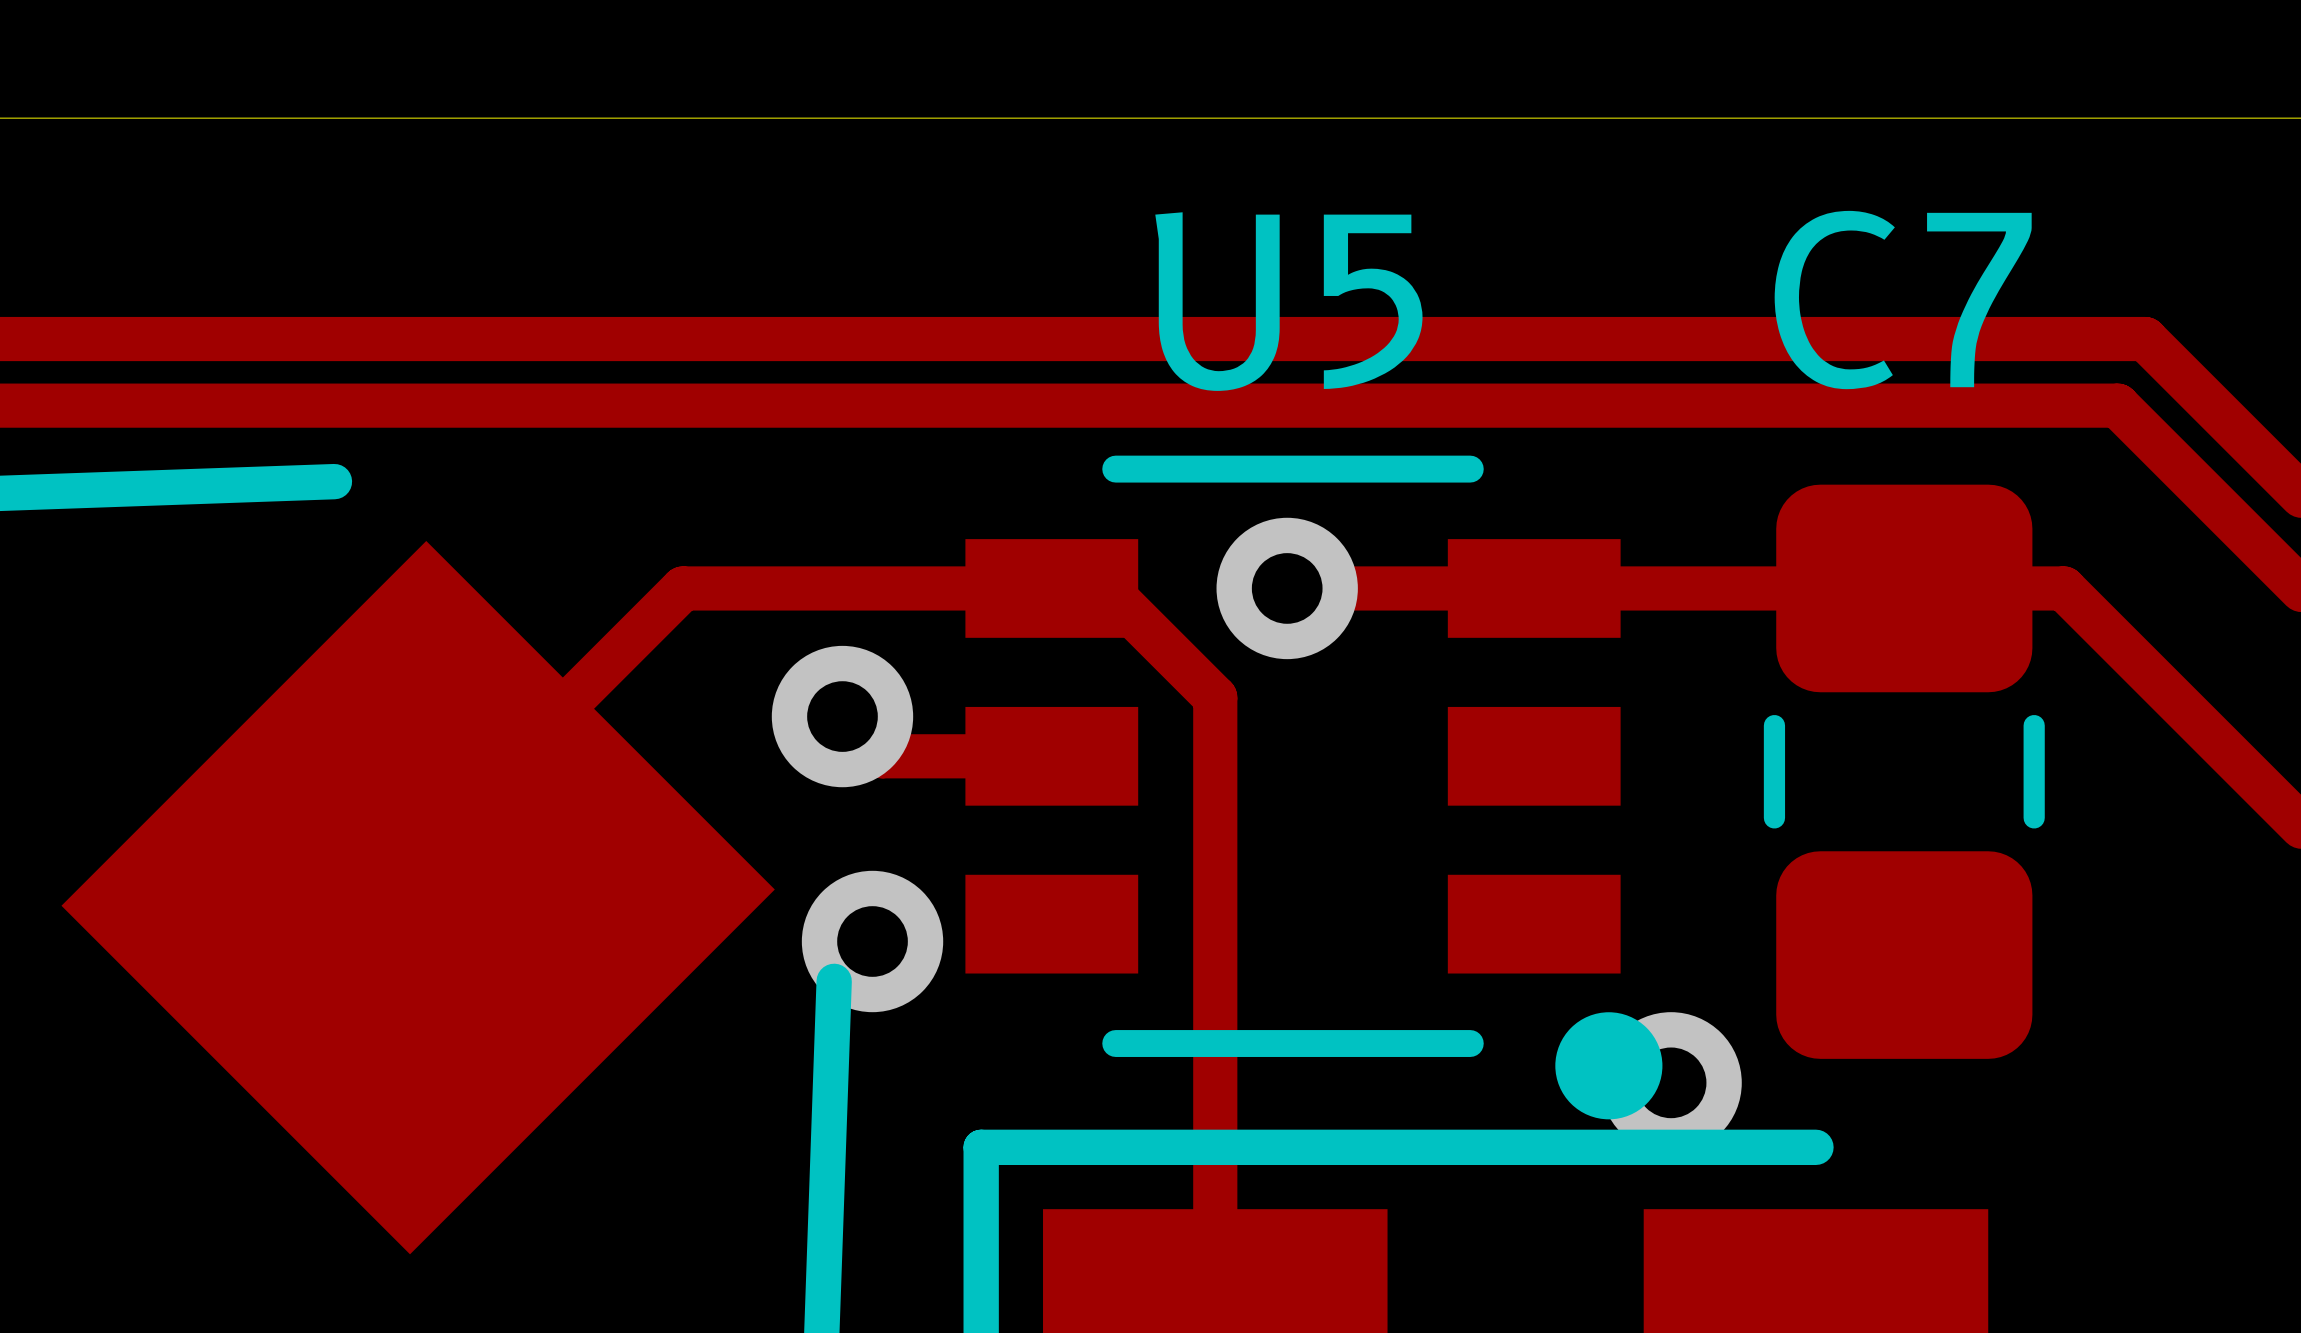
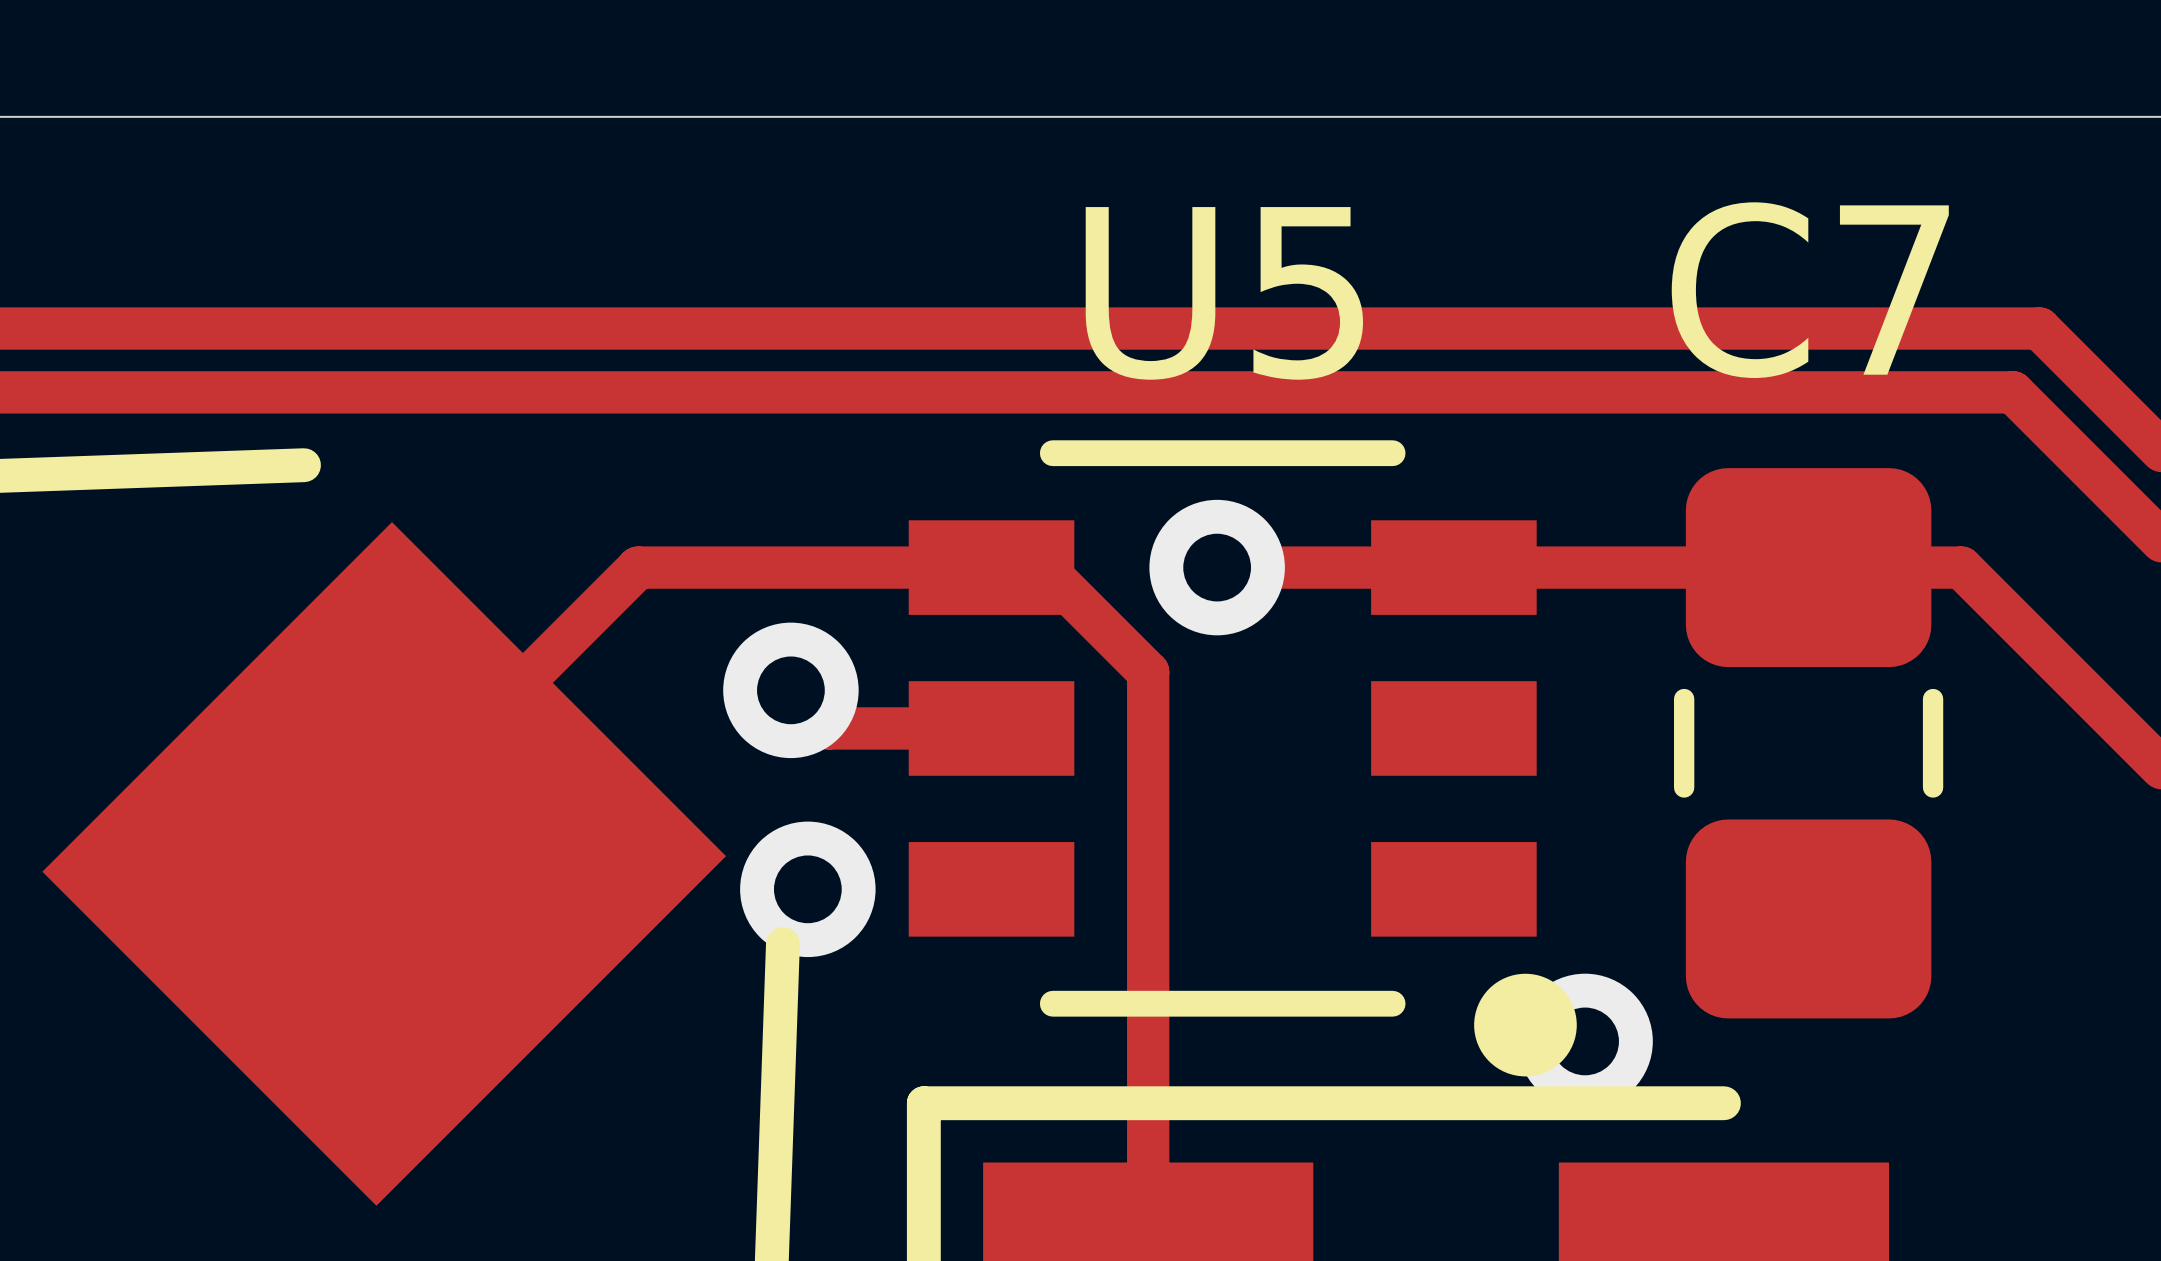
via position: (872, 941) -> (807, 889)

